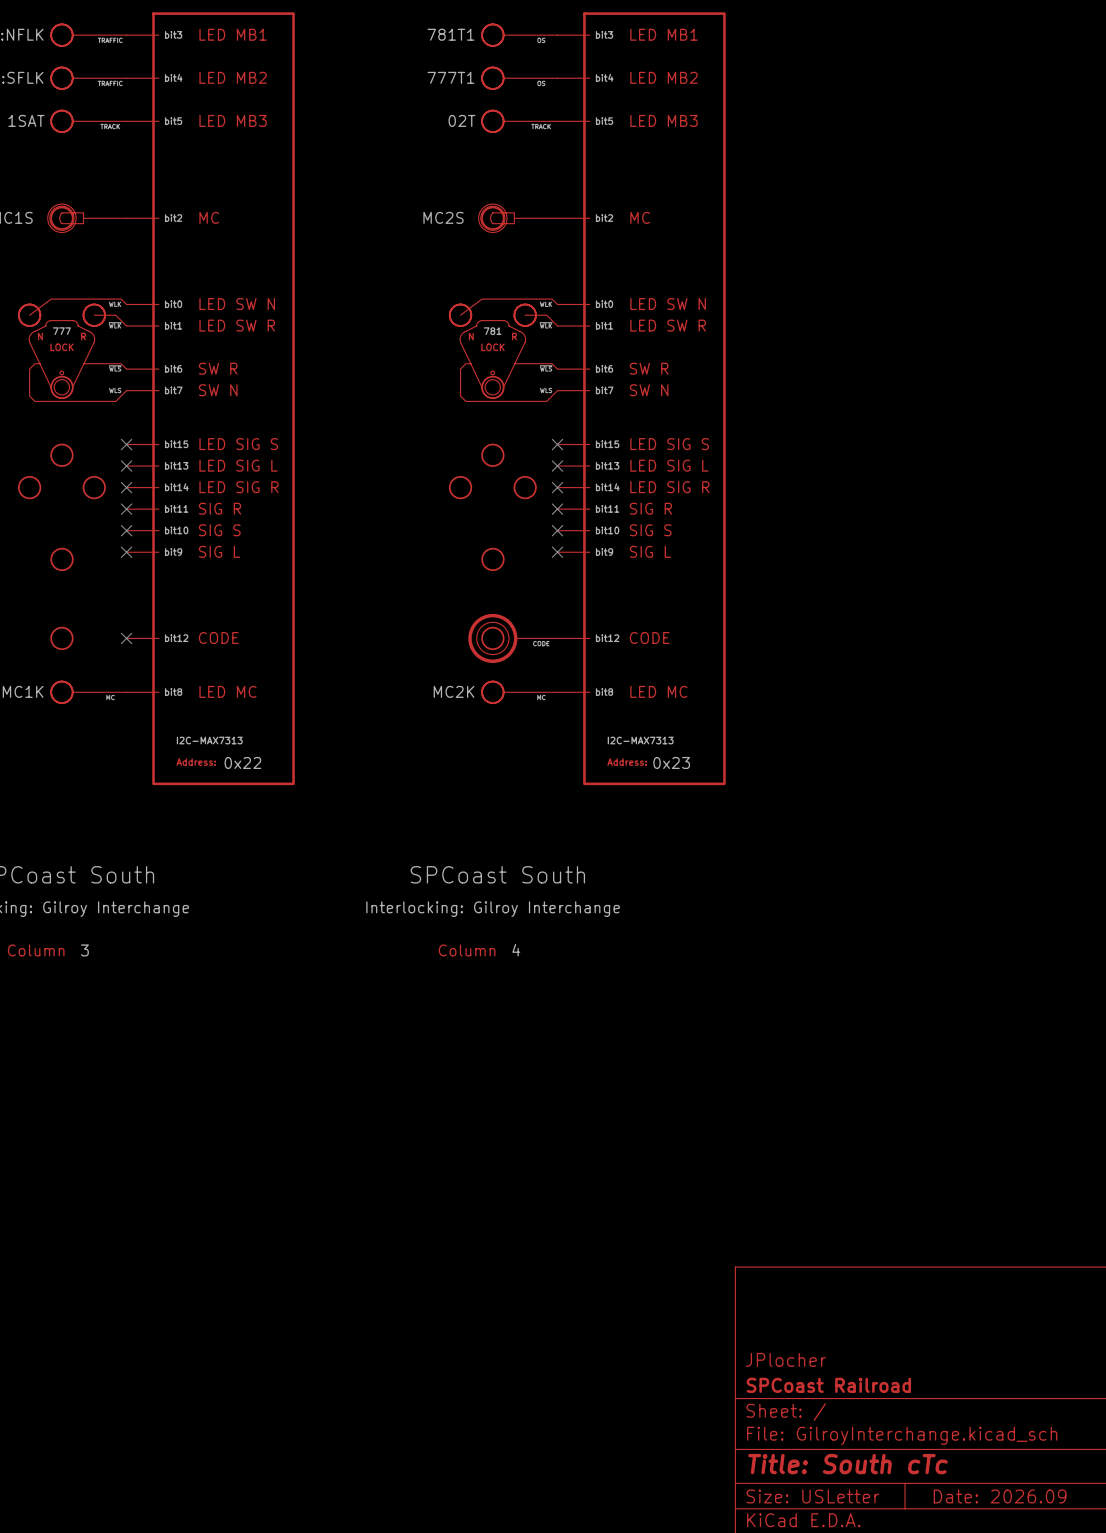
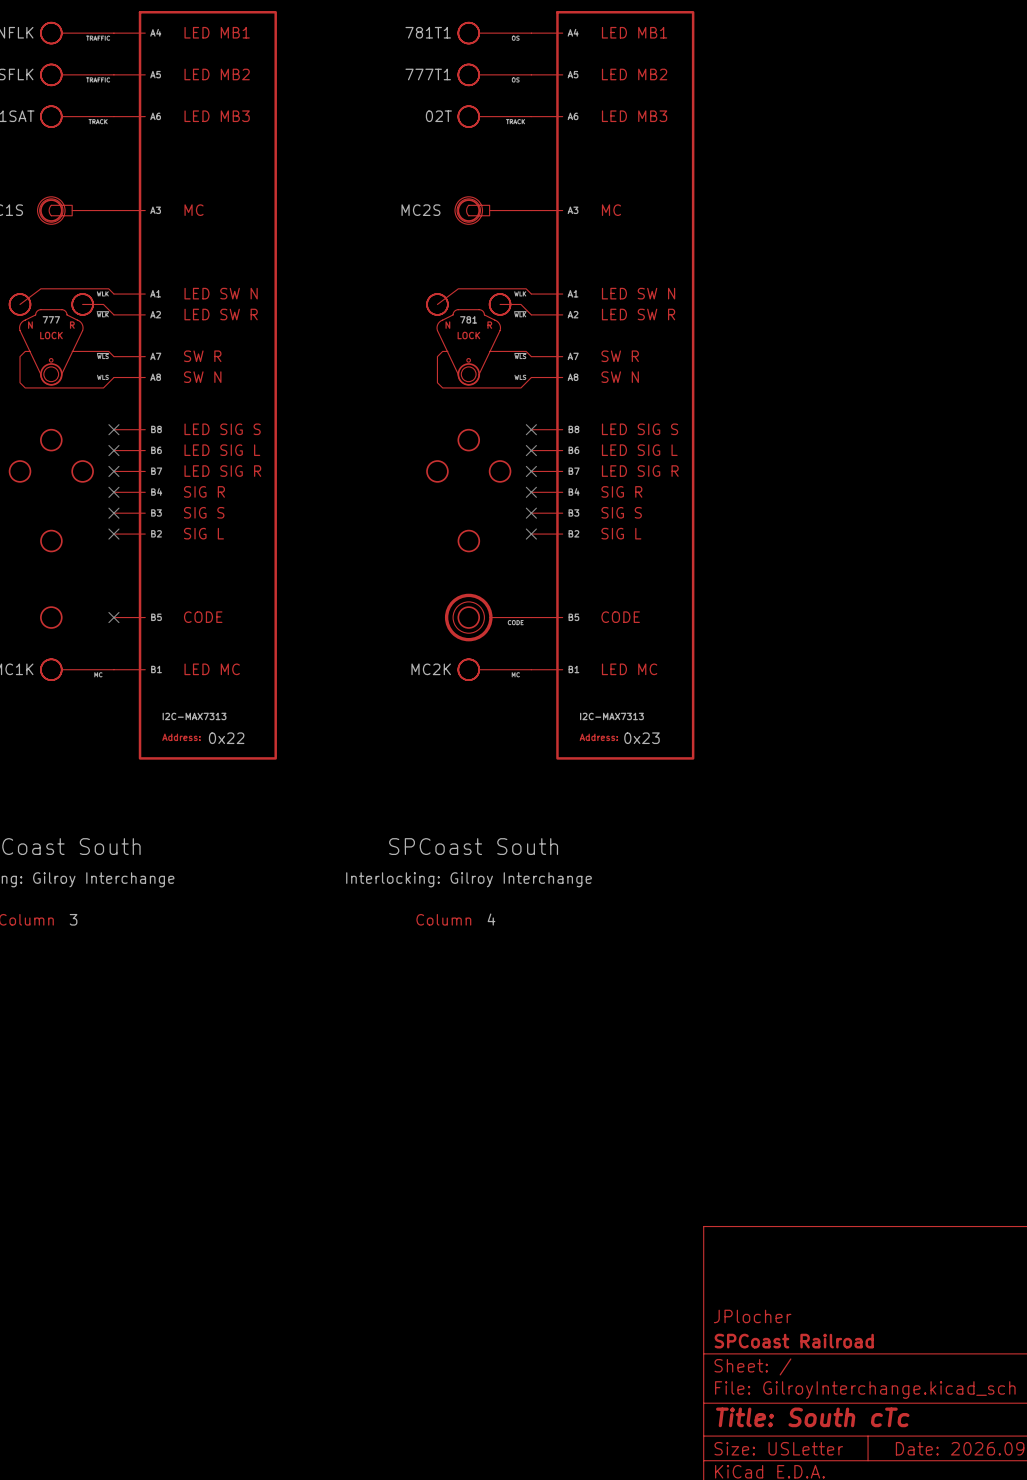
part symbol: [126, 12, 295, 786] -> [113, 11, 277, 760]
part symbol: [557, 12, 726, 786] -> [531, 11, 695, 760]

